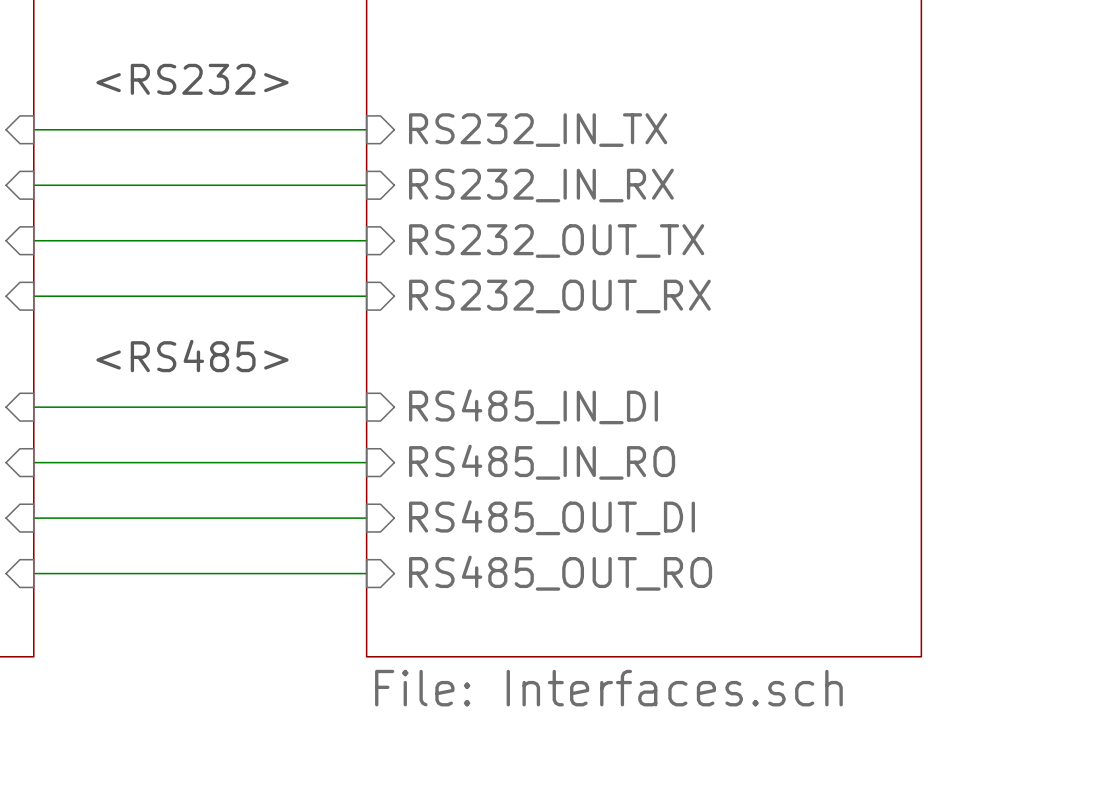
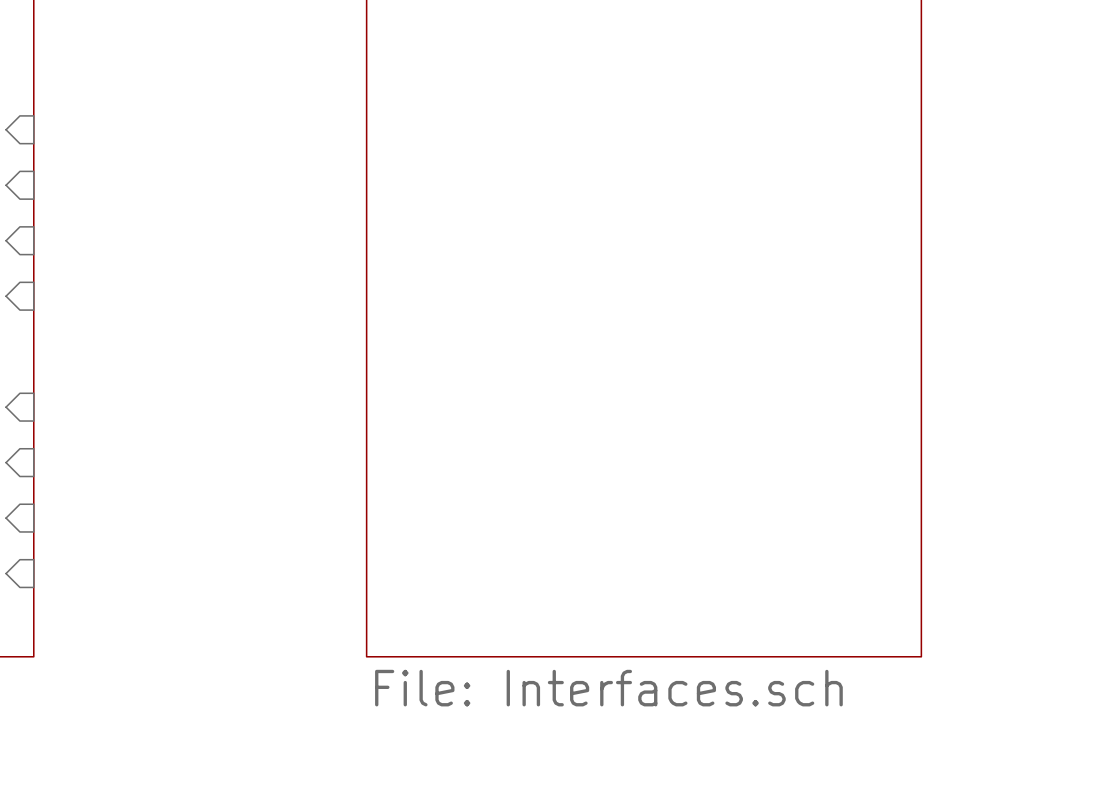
text: <RS232> (192, 79) -> none
wire: (33, 129) (366, 129) -> none
sheet pin: RS232_IN_TX (538, 130) -> none
wire: (33, 185) (366, 185) -> none
sheet pin: RS232_IN_RX (541, 185) -> none
wire: (33, 240) (366, 240) -> none
sheet pin: RS232_OUT_TX (556, 241) -> none
wire: (33, 296) (366, 296) -> none
sheet pin: RS232_OUT_RX (559, 296) -> none
text: <RS485> (192, 356) -> none
sheet pin: RS485_IN_DI (533, 406) -> none
wire: (33, 407) (366, 407) -> none
wire: (33, 462) (366, 462) -> none
sheet pin: RS485_IN_RO (542, 462) -> none
sheet pin: RS485_OUT_DI (551, 517) -> none
wire: (33, 518) (366, 518) -> none
wire: (33, 573) (366, 573) -> none
sheet pin: RS485_OUT_RO (560, 573) -> none

